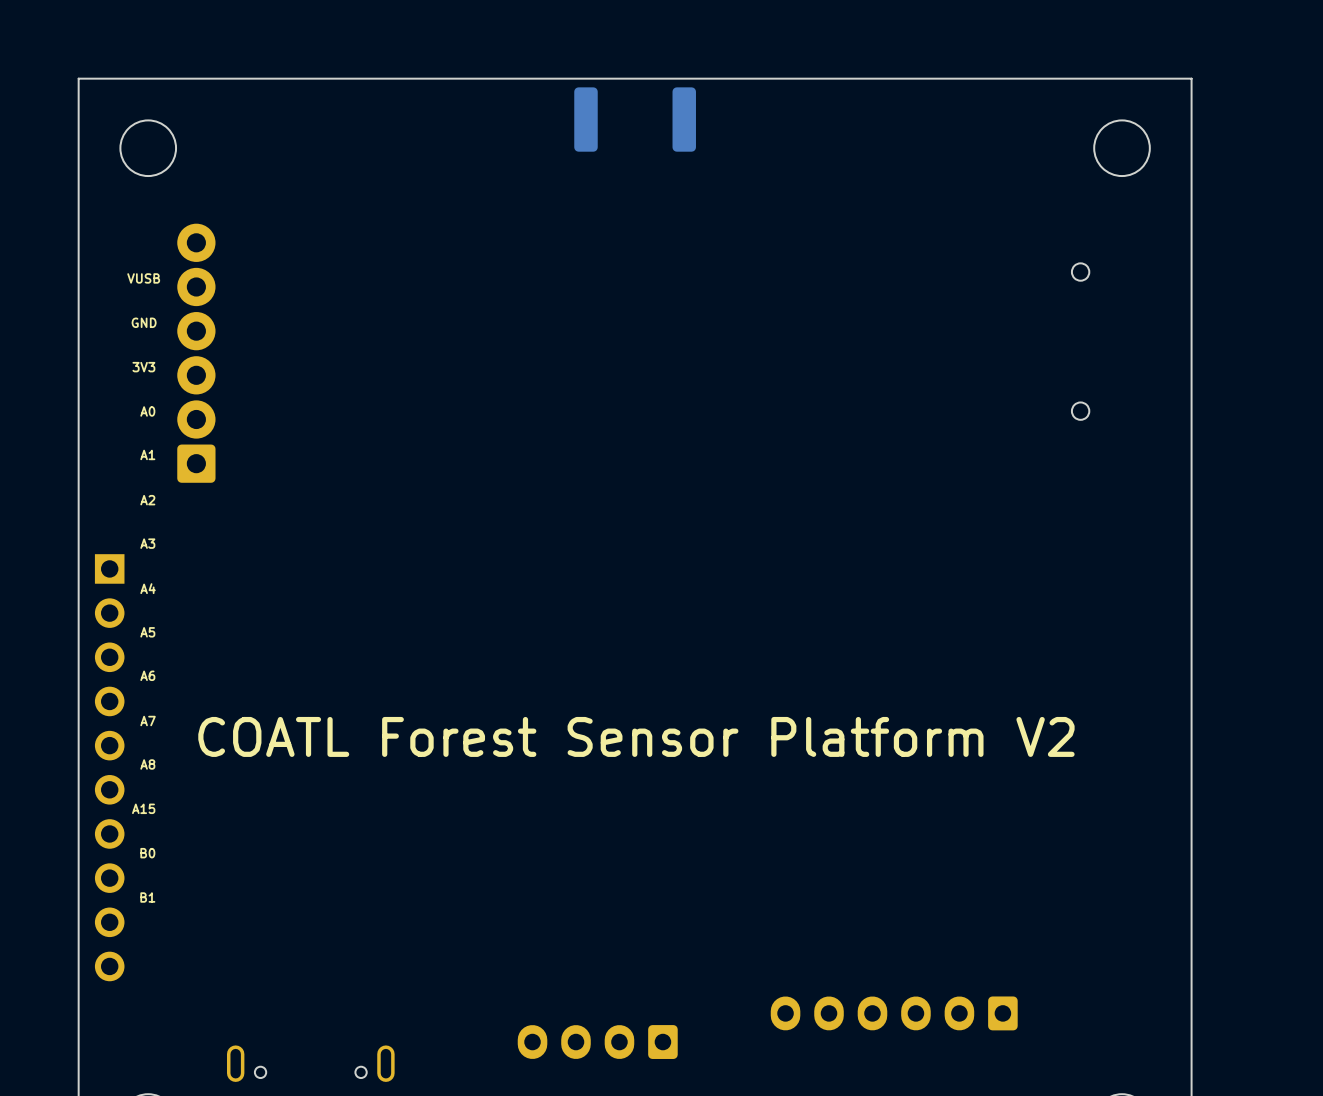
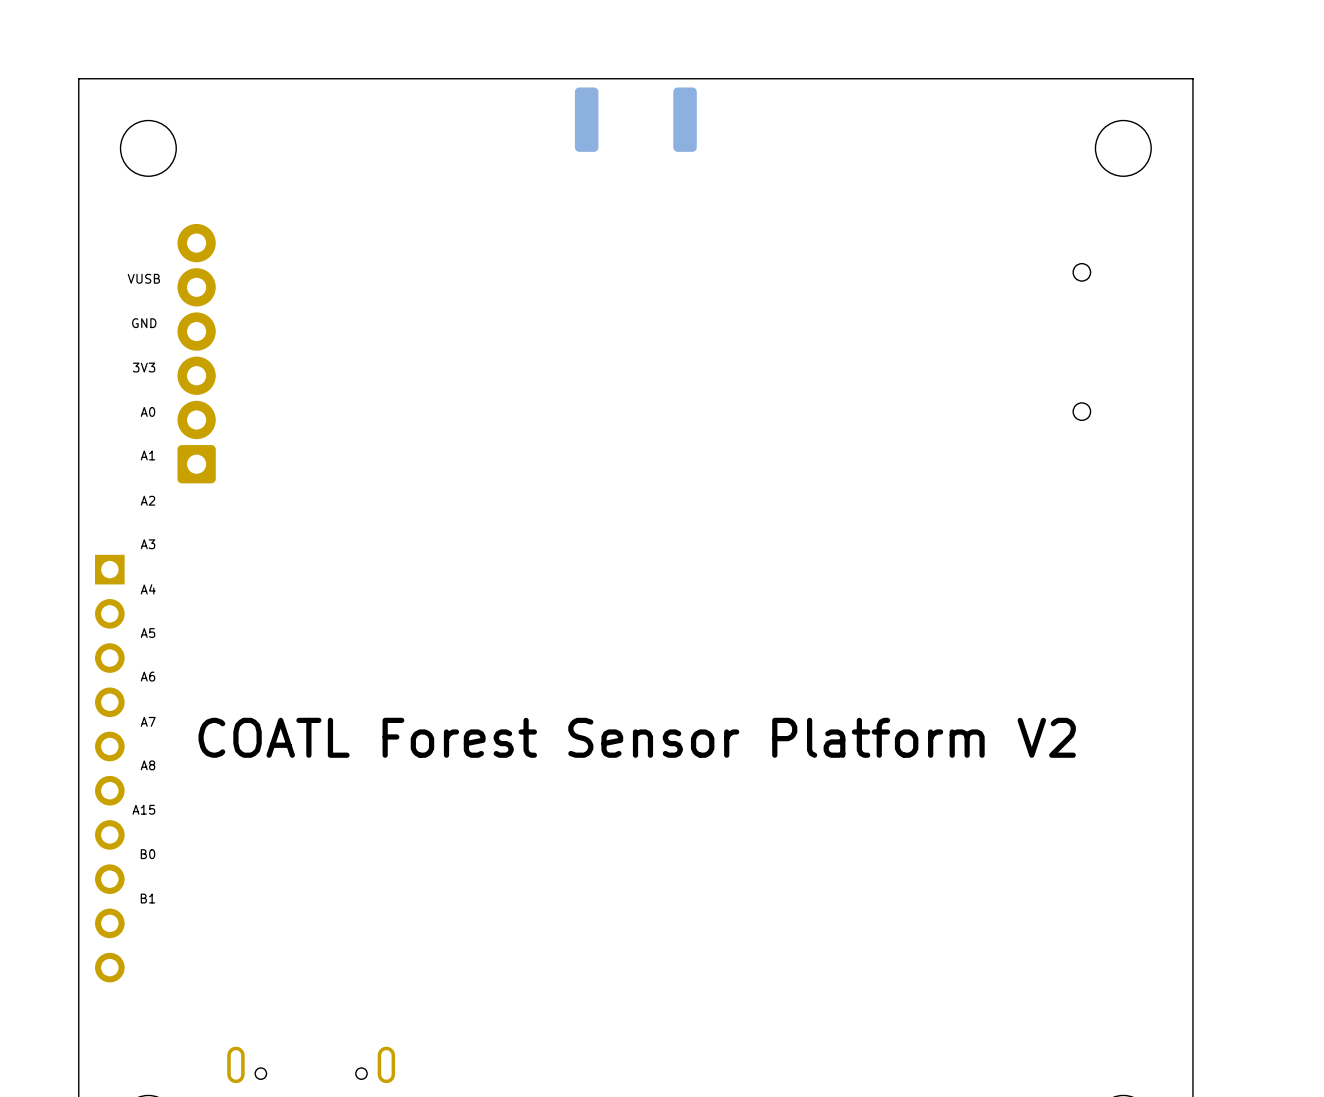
part: (894, 1013) -> none
part: (597, 1042) -> none

